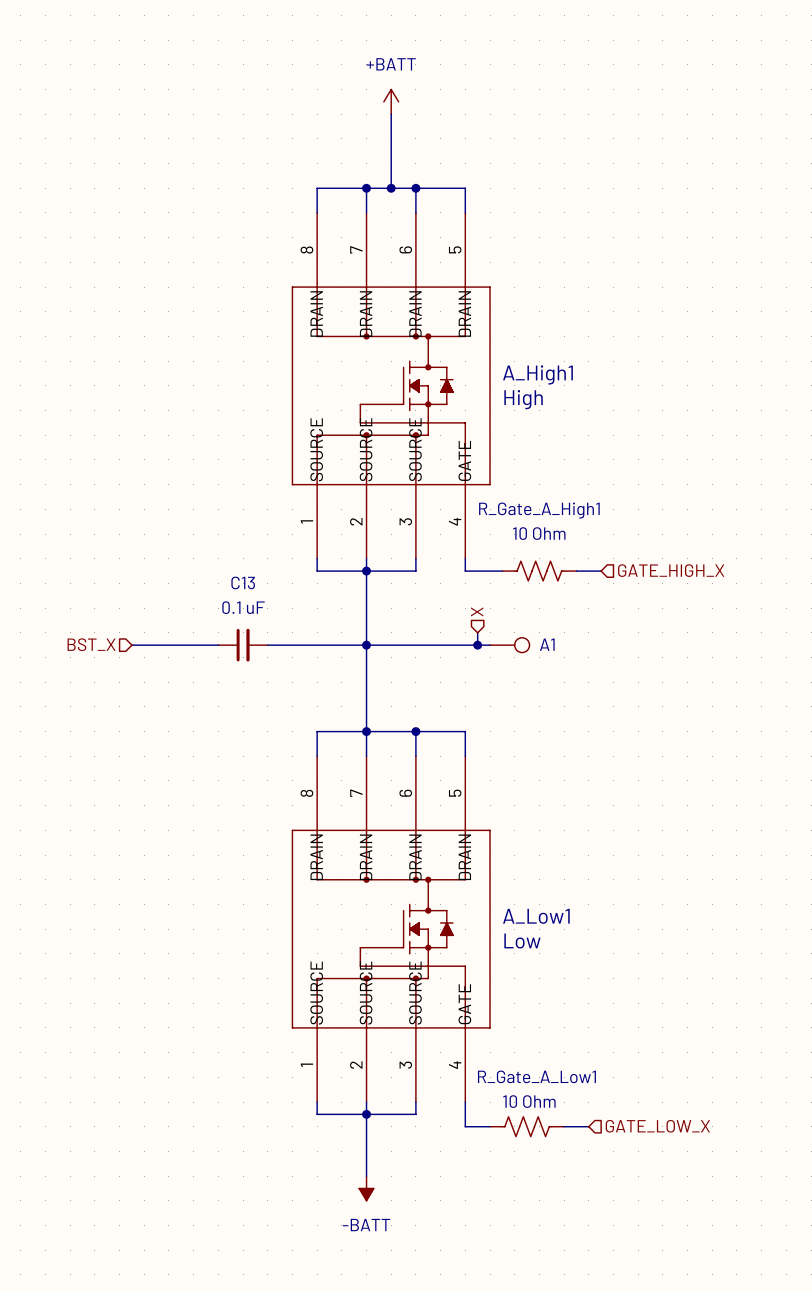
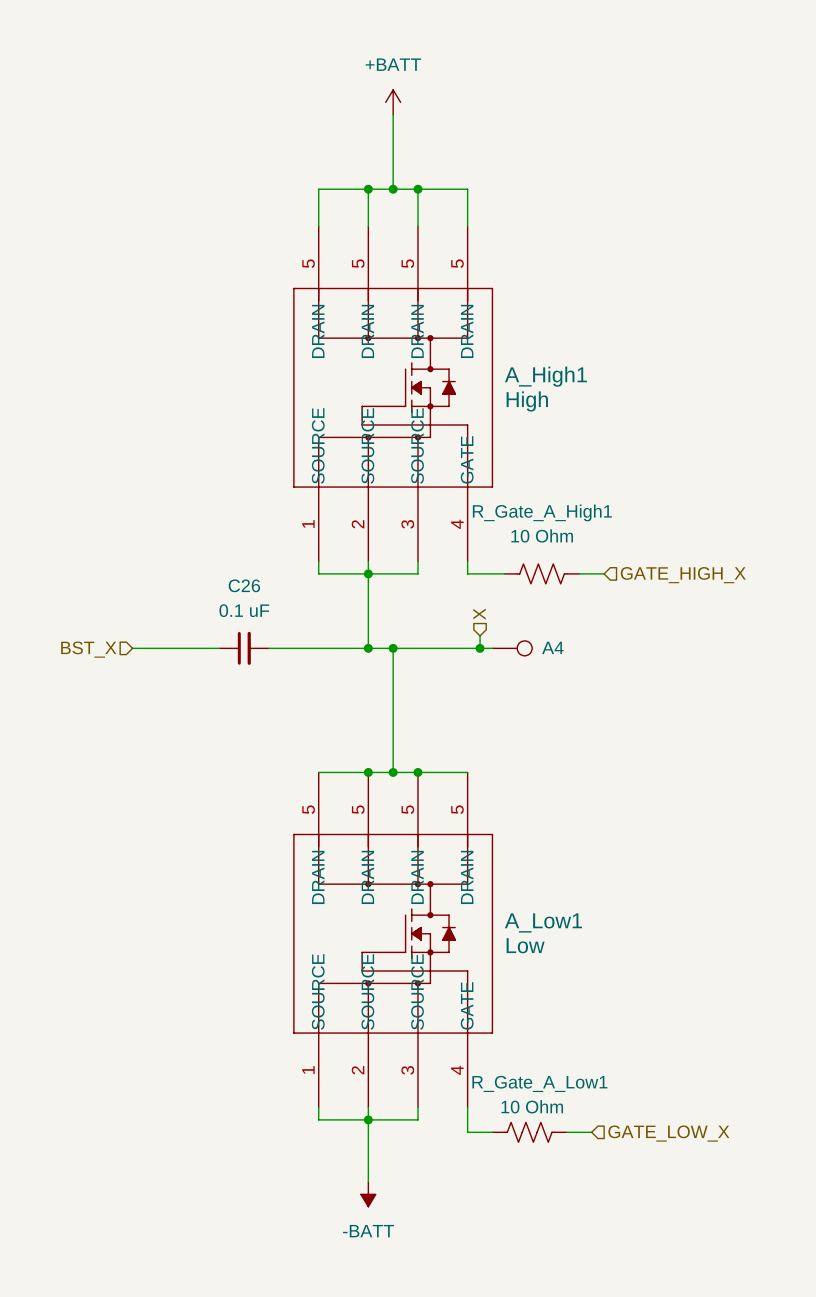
A_High1 symbol: [291, 212, 491, 559] -> [293, 226, 494, 562]
C13 name: C13 (243, 582) -> C26 (244, 585)
A1 name: A1 (547, 644) -> A4 (552, 647)
wire: (366, 645) (366, 756) -> none
wire: none -> (393, 648) (393, 772)
junction: none -> (393, 648)
junction: (366, 731) -> none
wire: (415, 731) (415, 756) -> none
junction: (415, 731) -> none
A_Low1 symbol: [291, 756, 491, 1103] -> [293, 772, 494, 1108]
wire: (317, 756) (317, 731) (465, 731) (465, 756) -> none
wire: none -> (318, 772) (467, 772)
junction: none -> (368, 772)
junction: none -> (393, 772)
junction: none -> (417, 772)

